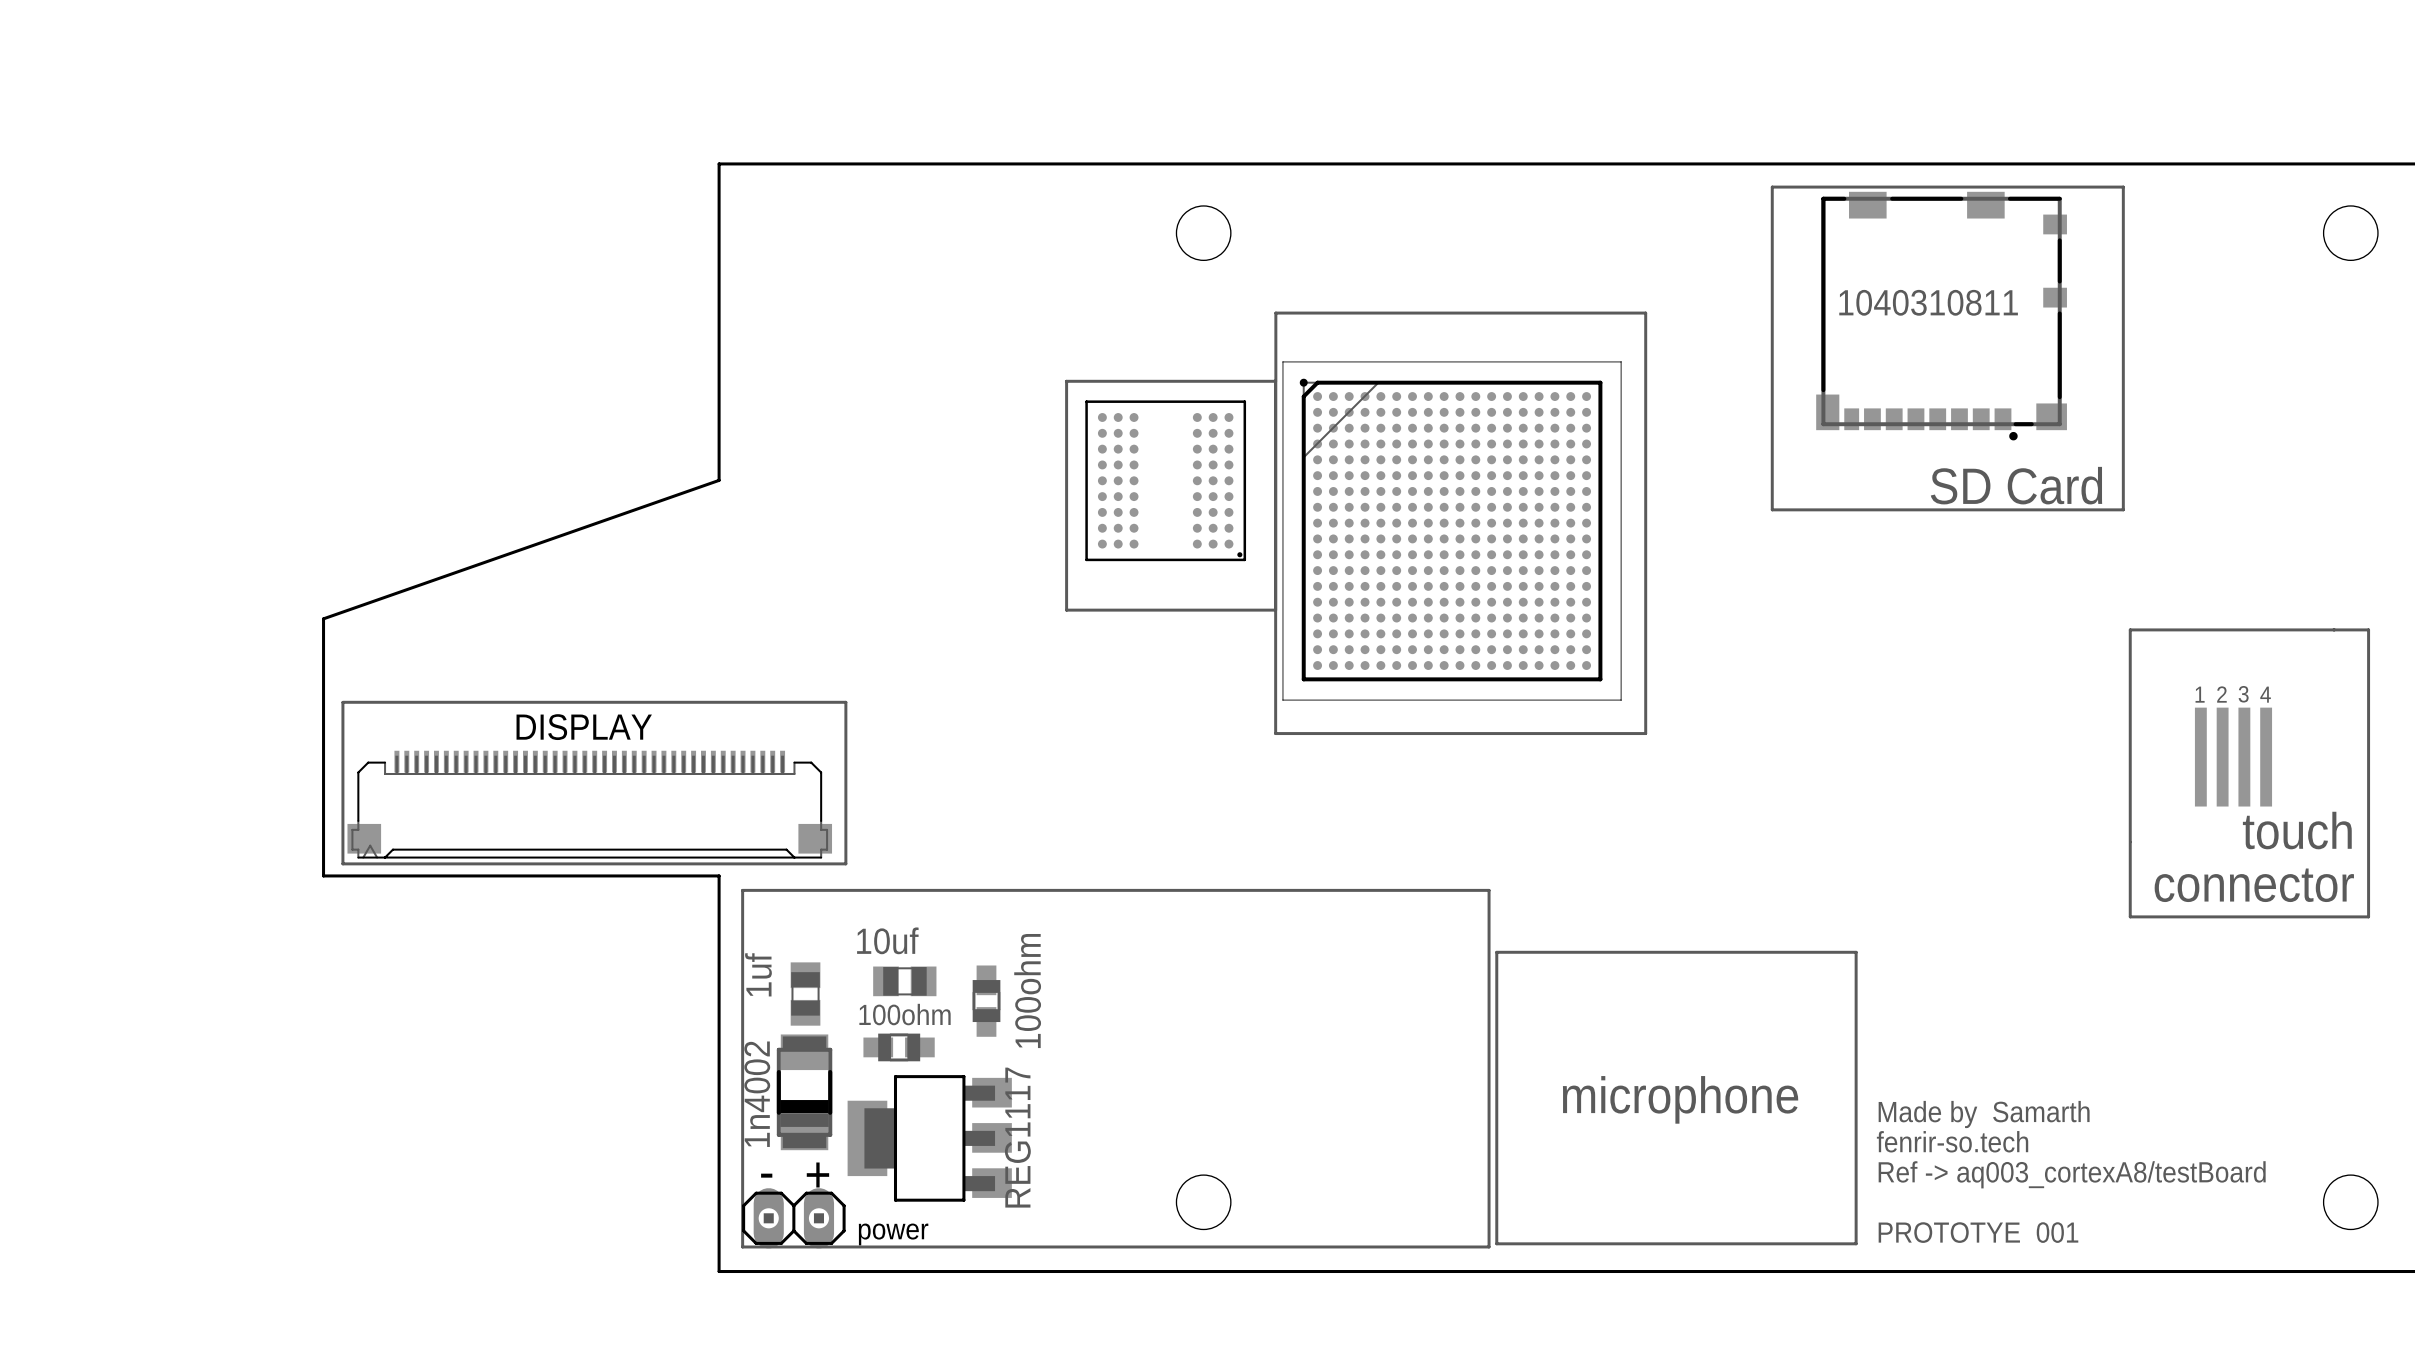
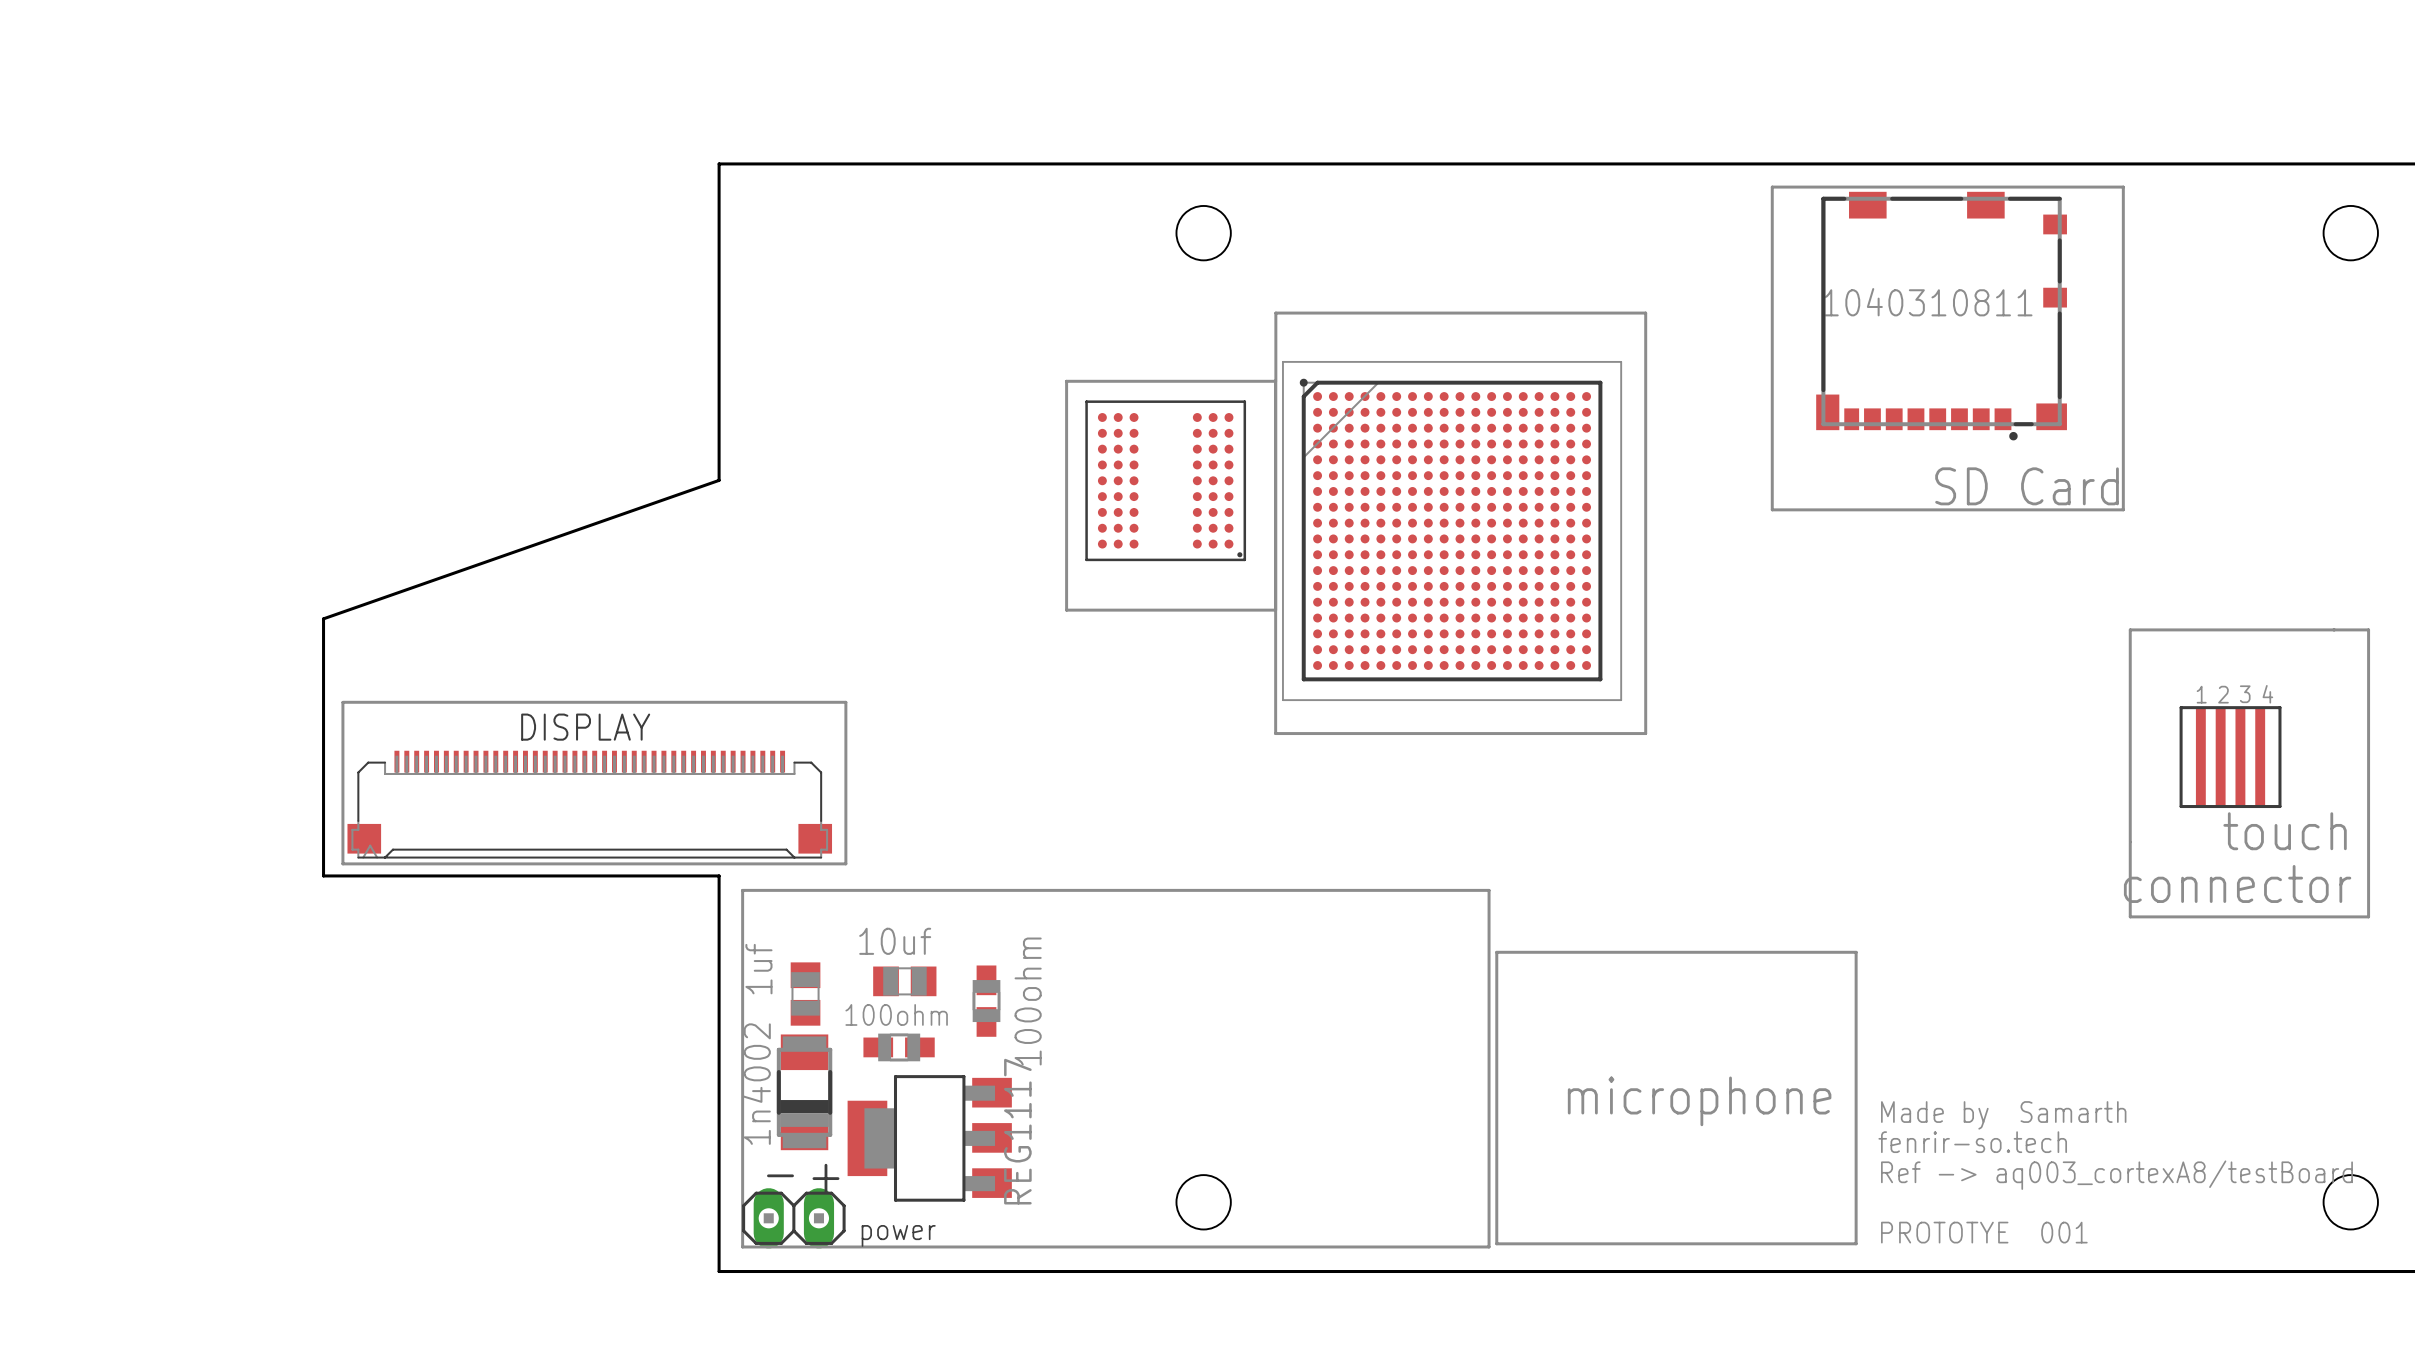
part footprint: [2194, 707, 2273, 807] -> [2179, 706, 2282, 809]

